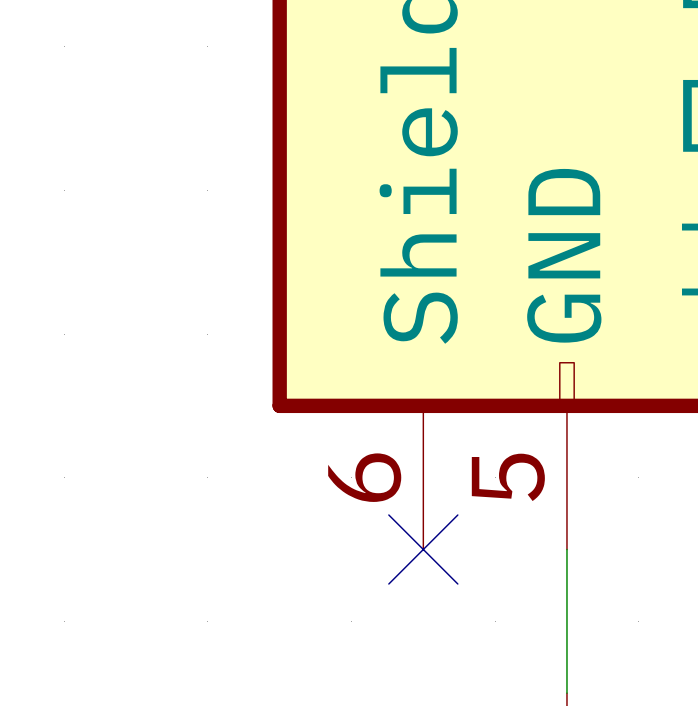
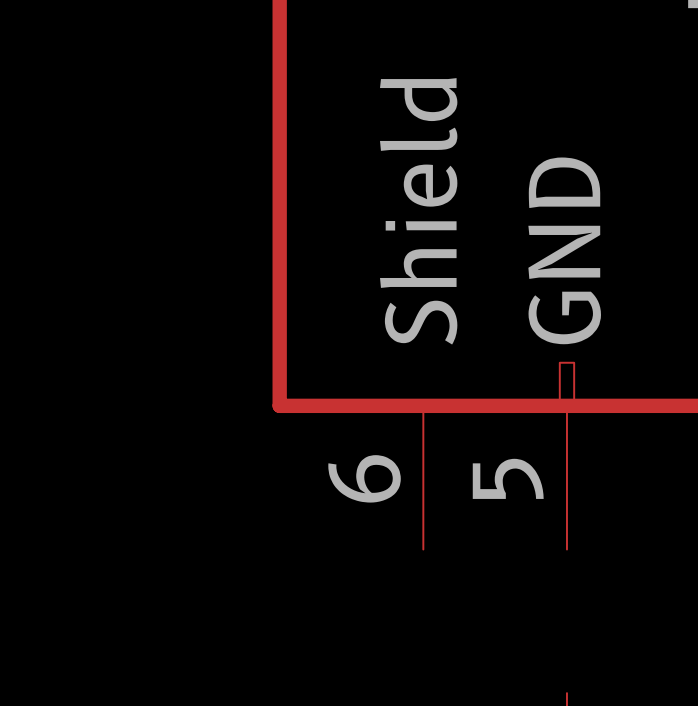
no-connect mark: (423, 549) -> none
wire: (566, 549) (566, 693) -> none

